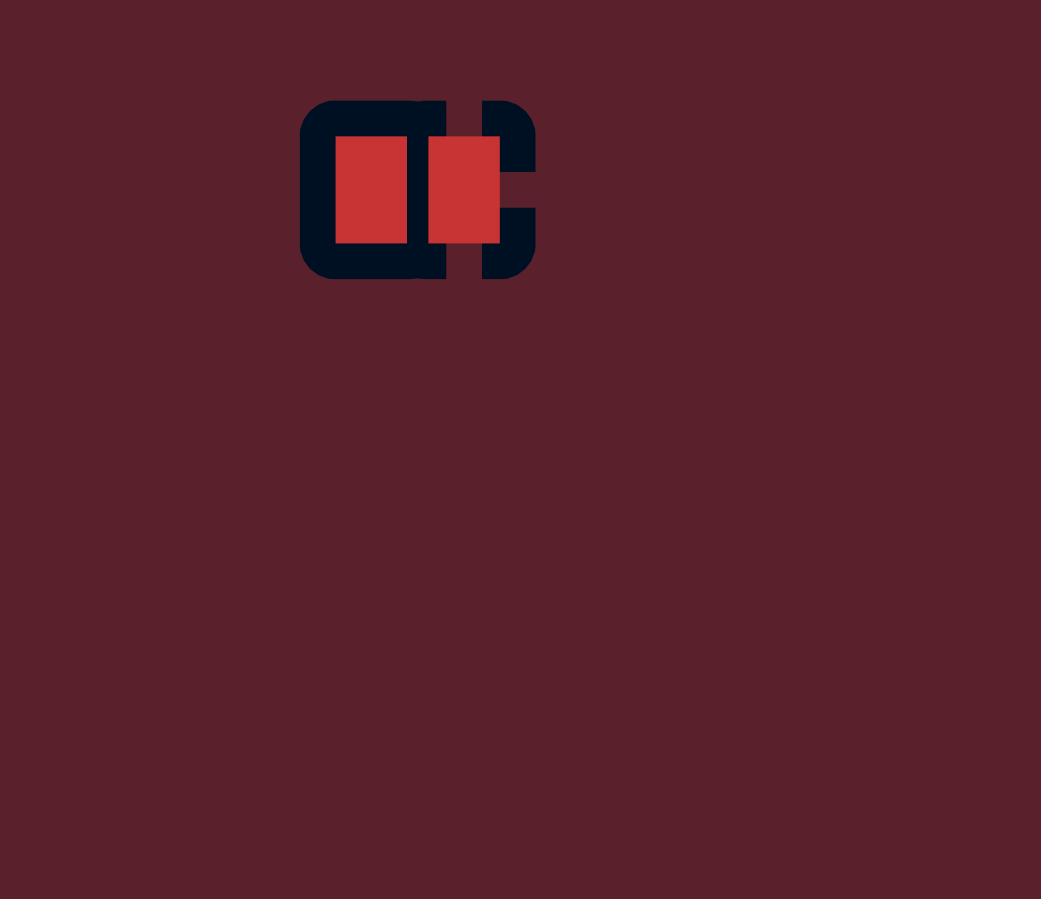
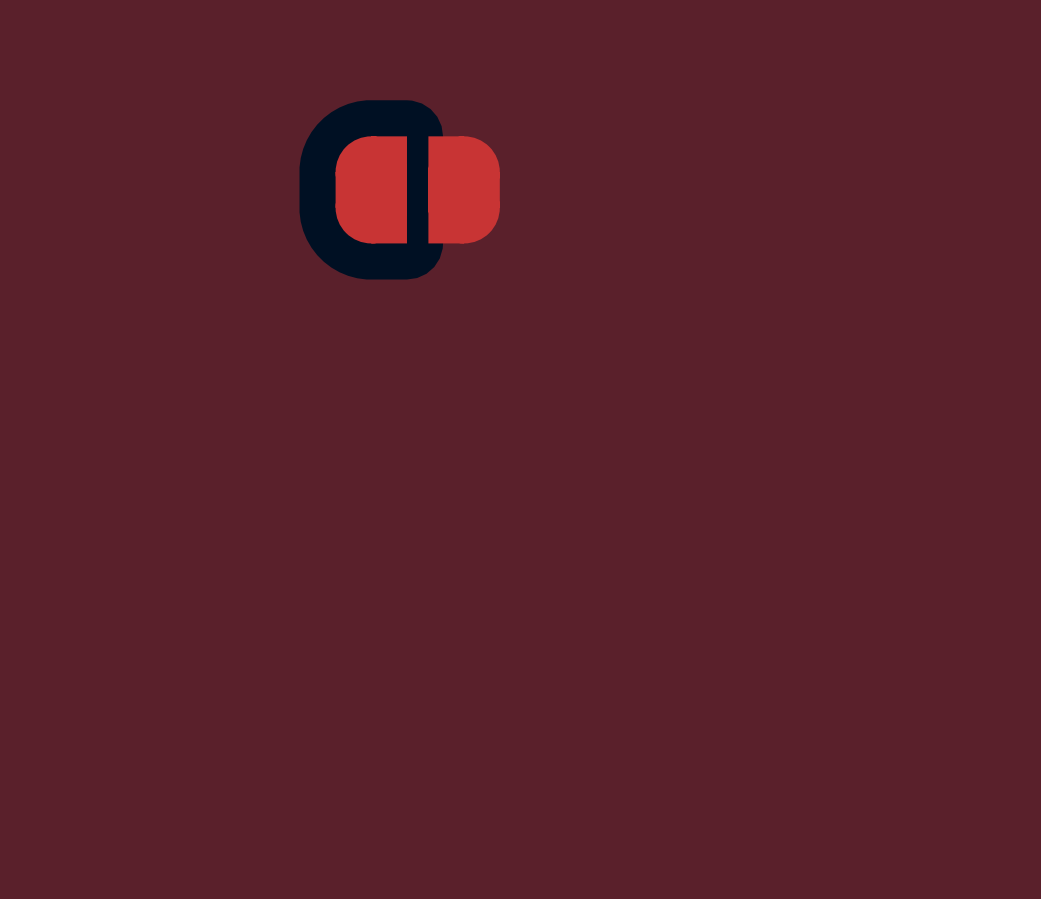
part footprint: [335, 136, 500, 244] -> [335, 136, 500, 244]

